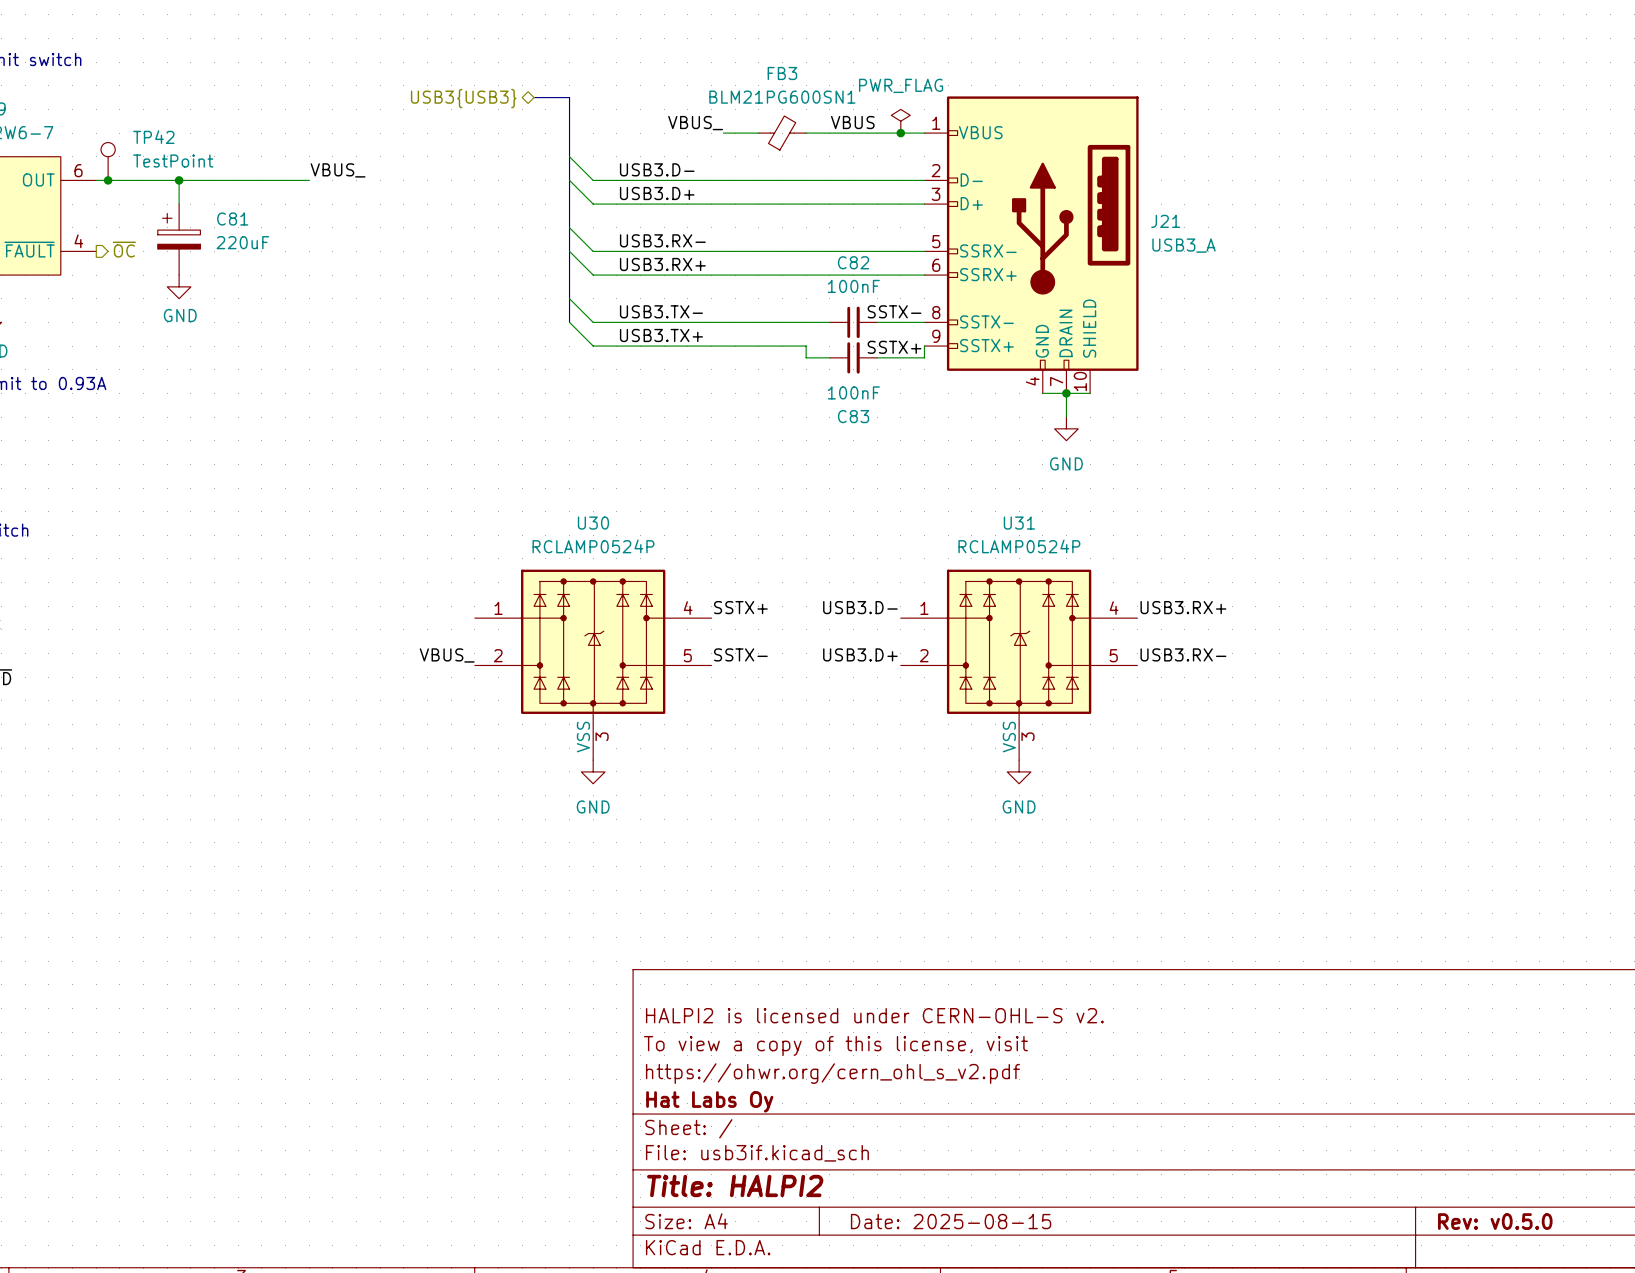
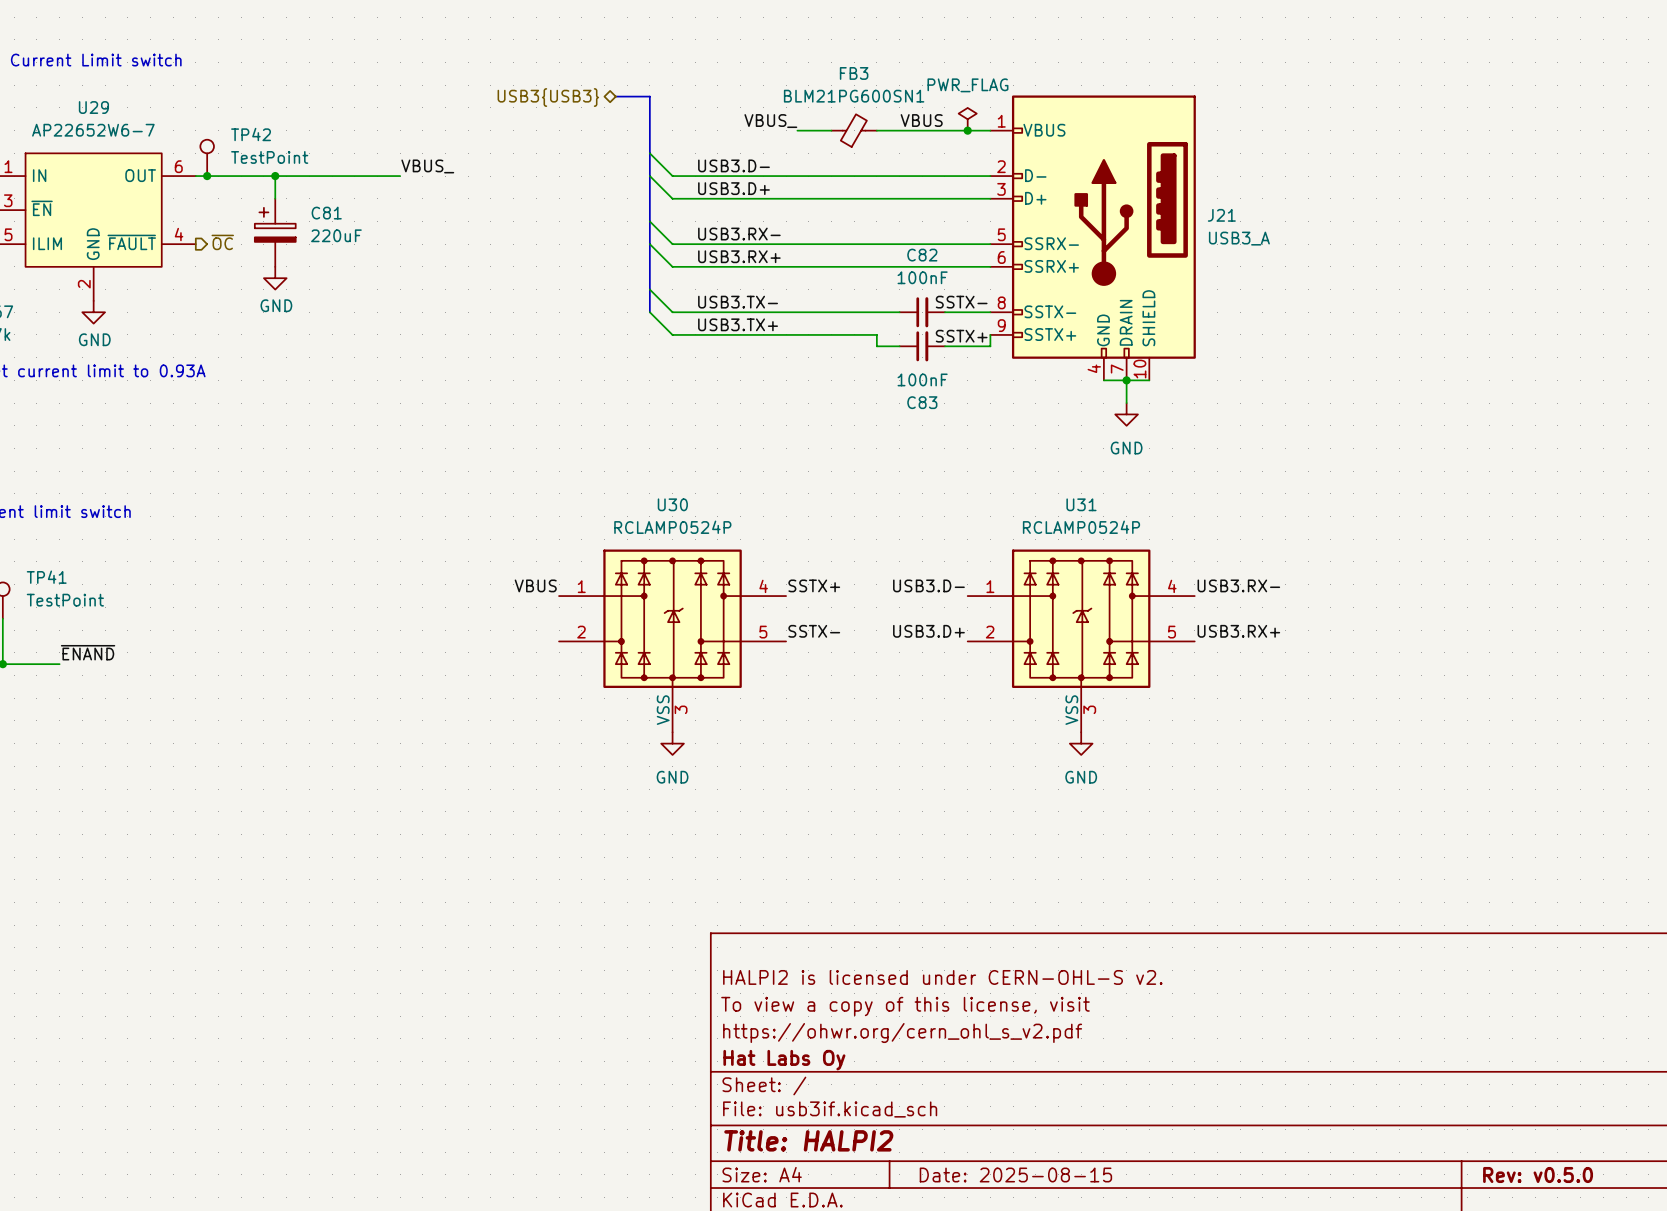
label: none -> VBUS (535, 585)
label: USB3.RX+ (1183, 607) -> USB3.RX- (1238, 585)
label: USB3.RX- (1183, 654) -> USB3.RX+ (1238, 631)
label: VBUS_ (447, 655) -> none

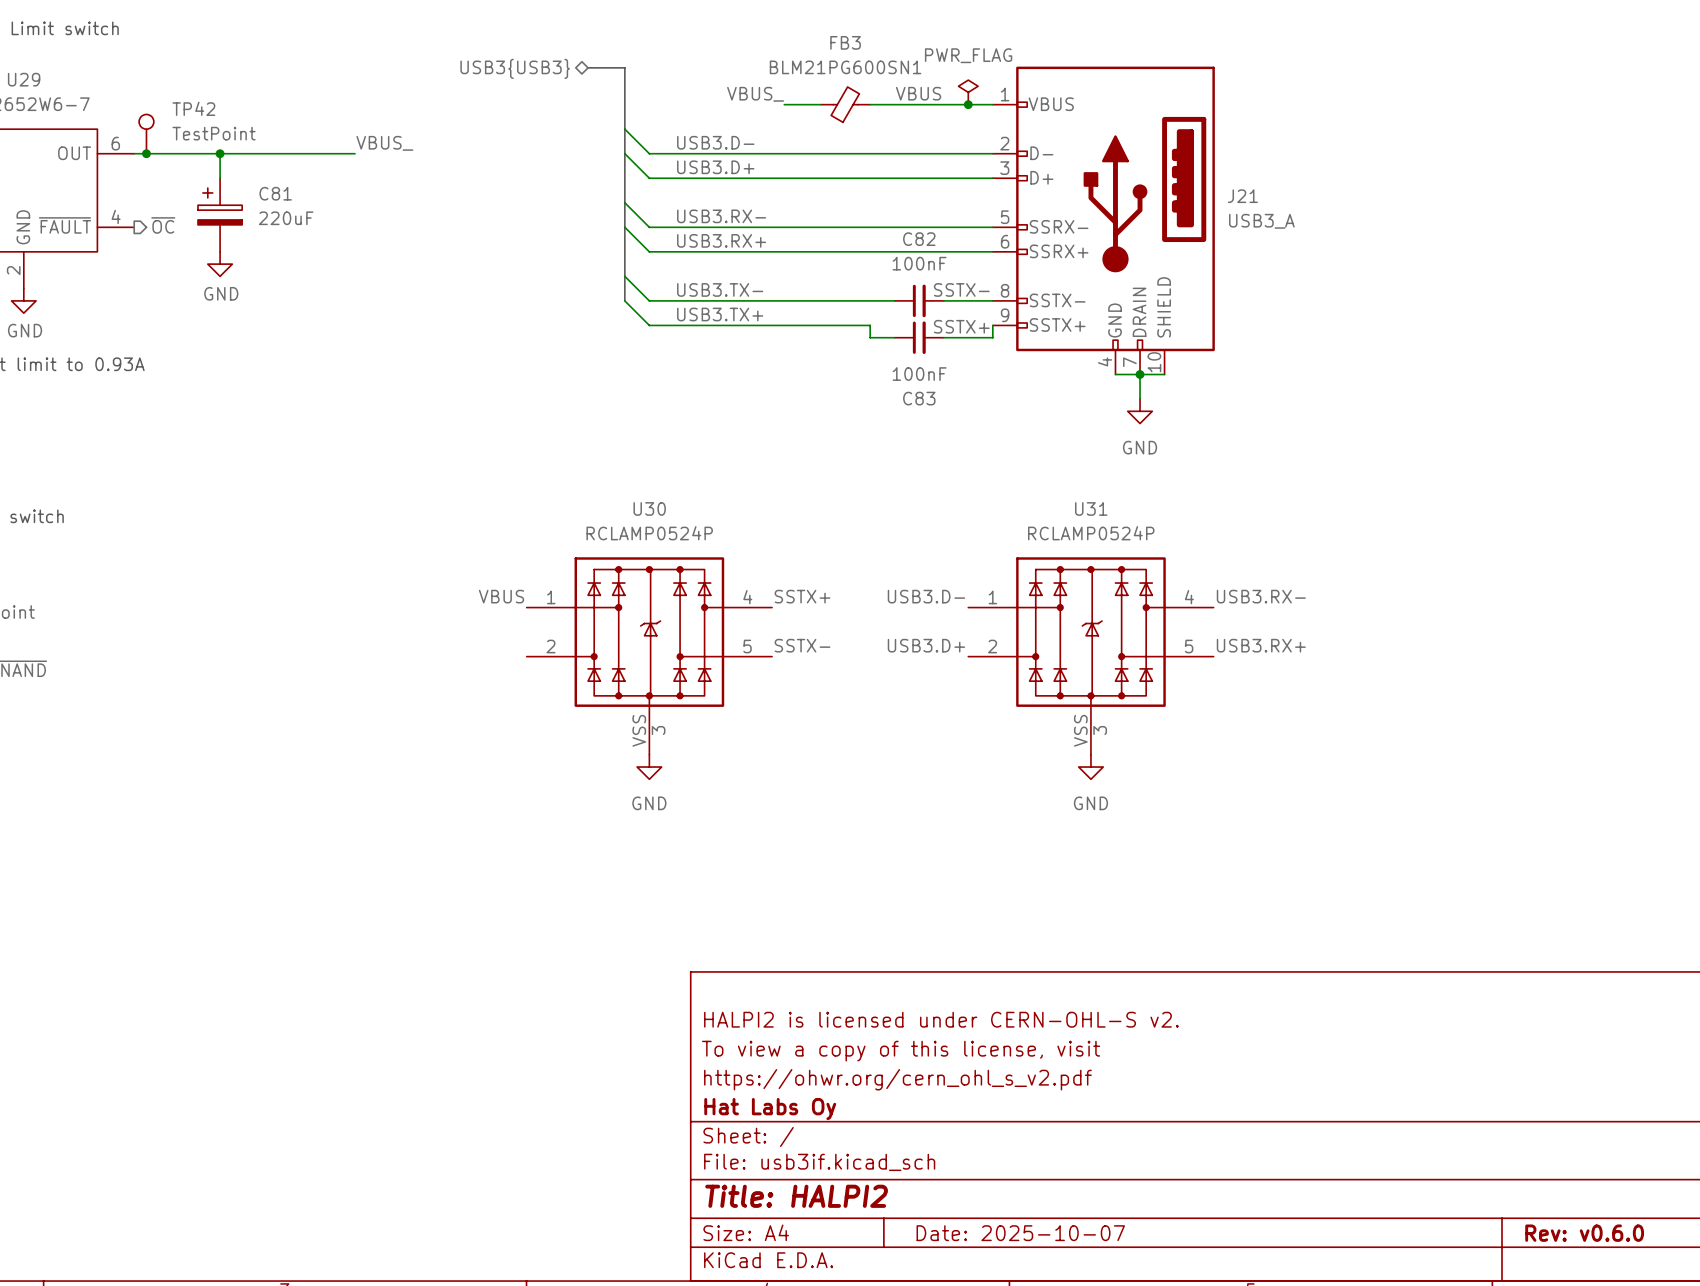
title block: Date: 2025-08-15 (1015, 1174) -> Date: 2025-10-07 (1020, 1233)
title block: Rev: v0.5.0 (1538, 1174) -> Rev: v0.6.0 (1584, 1233)

